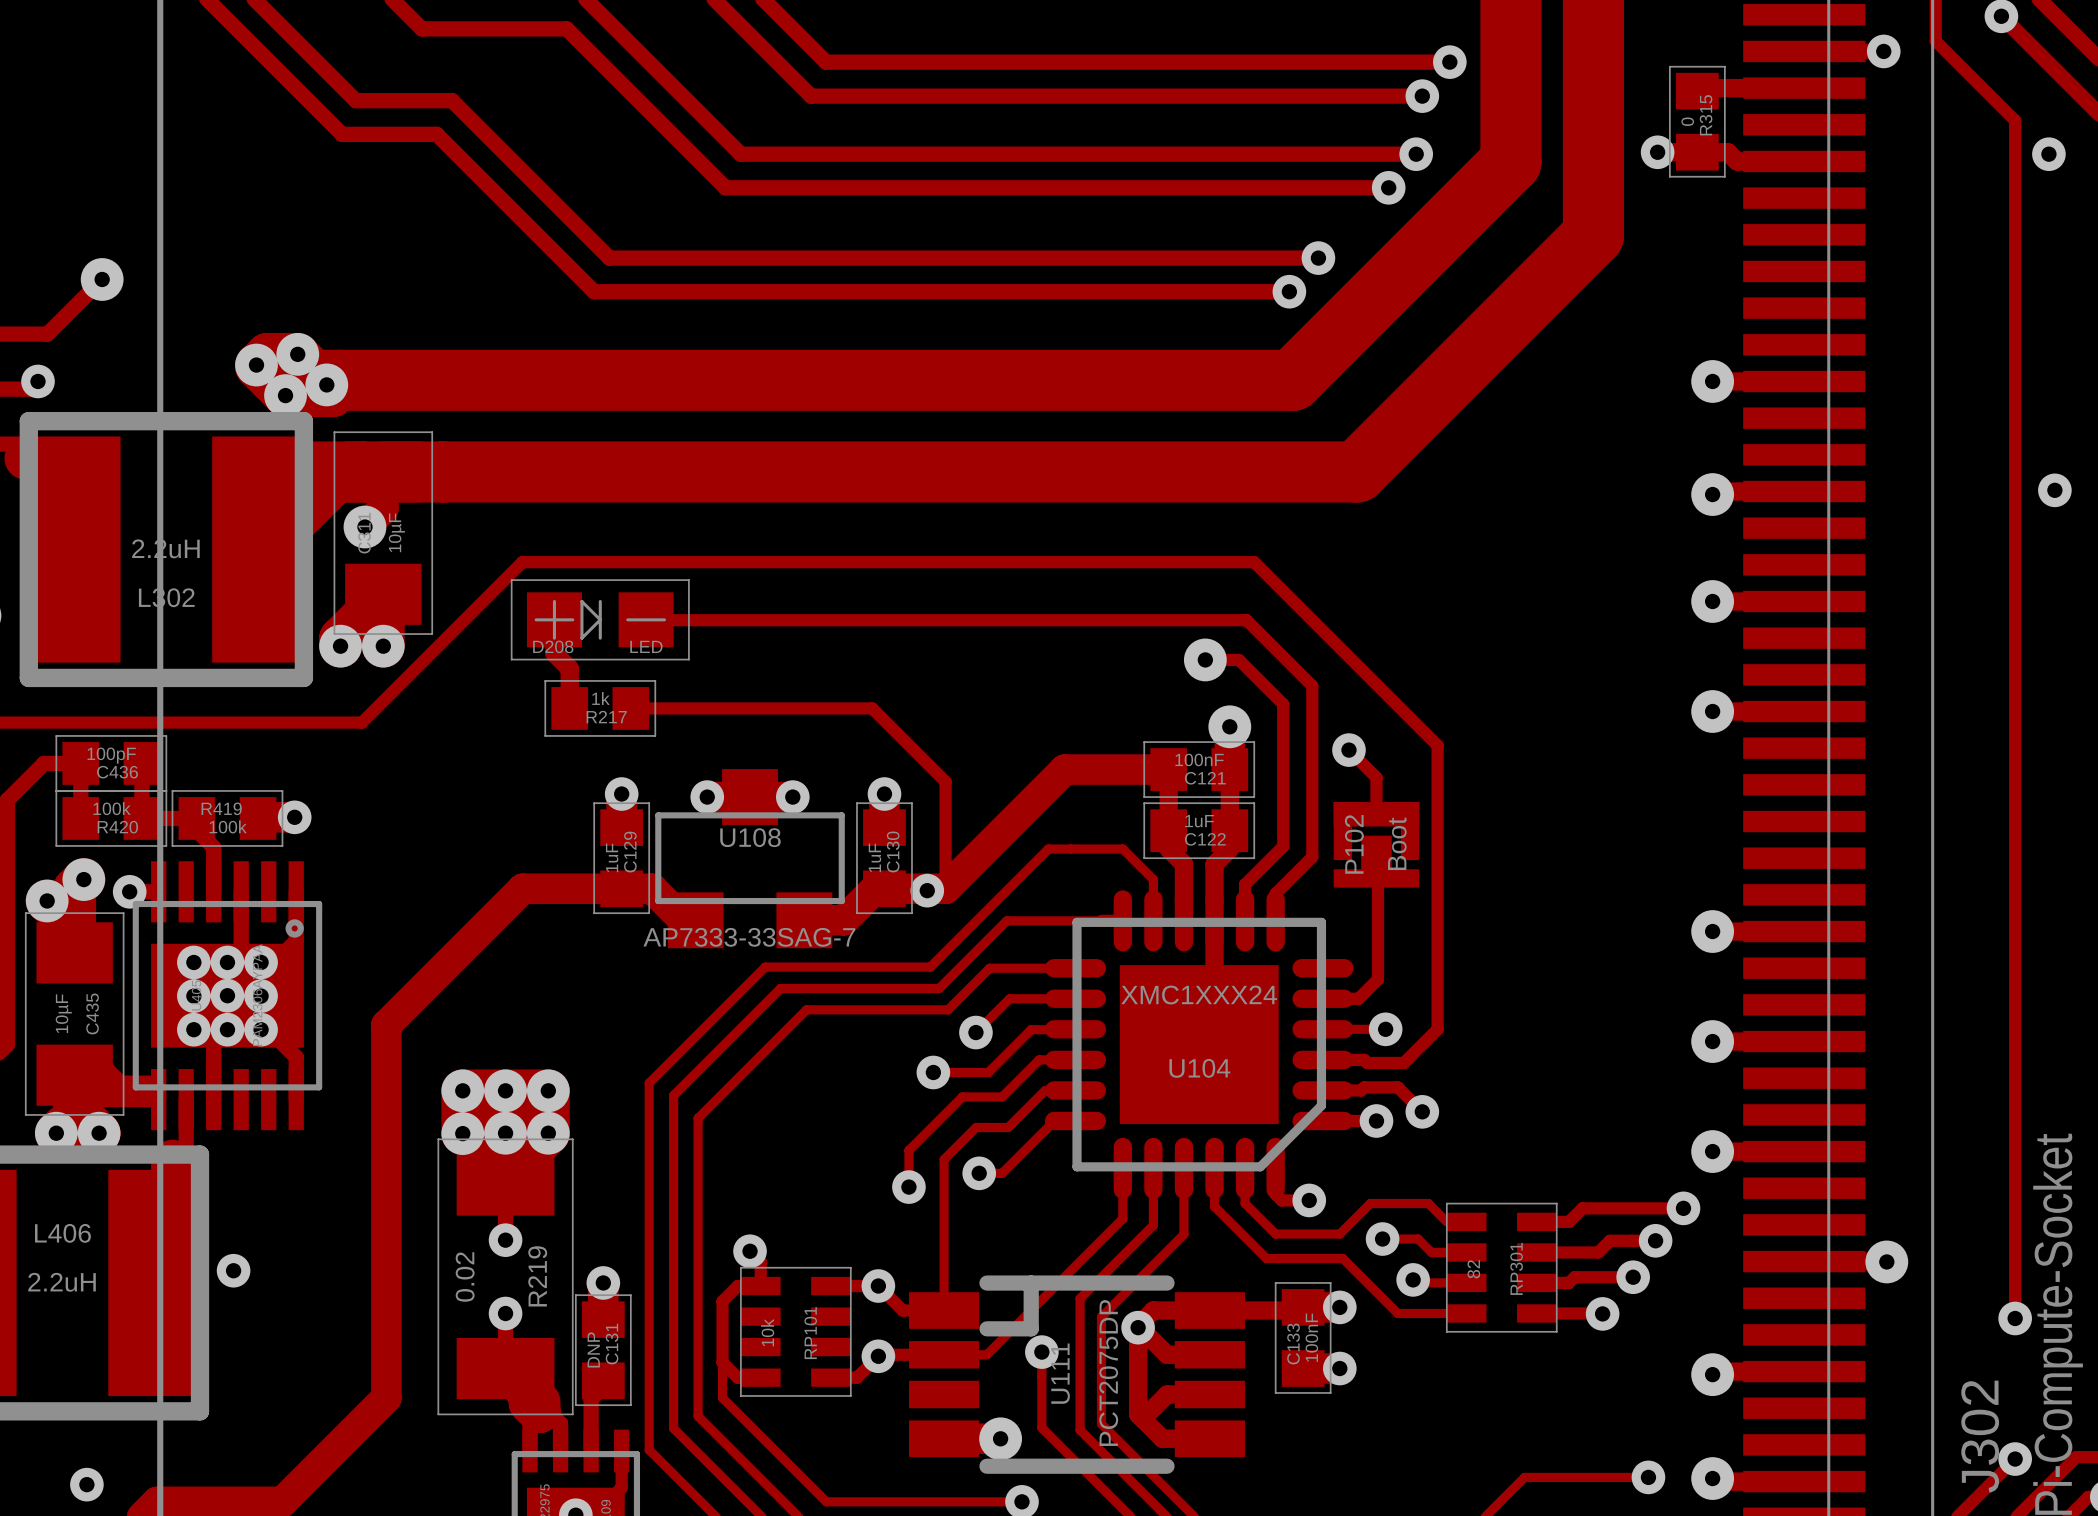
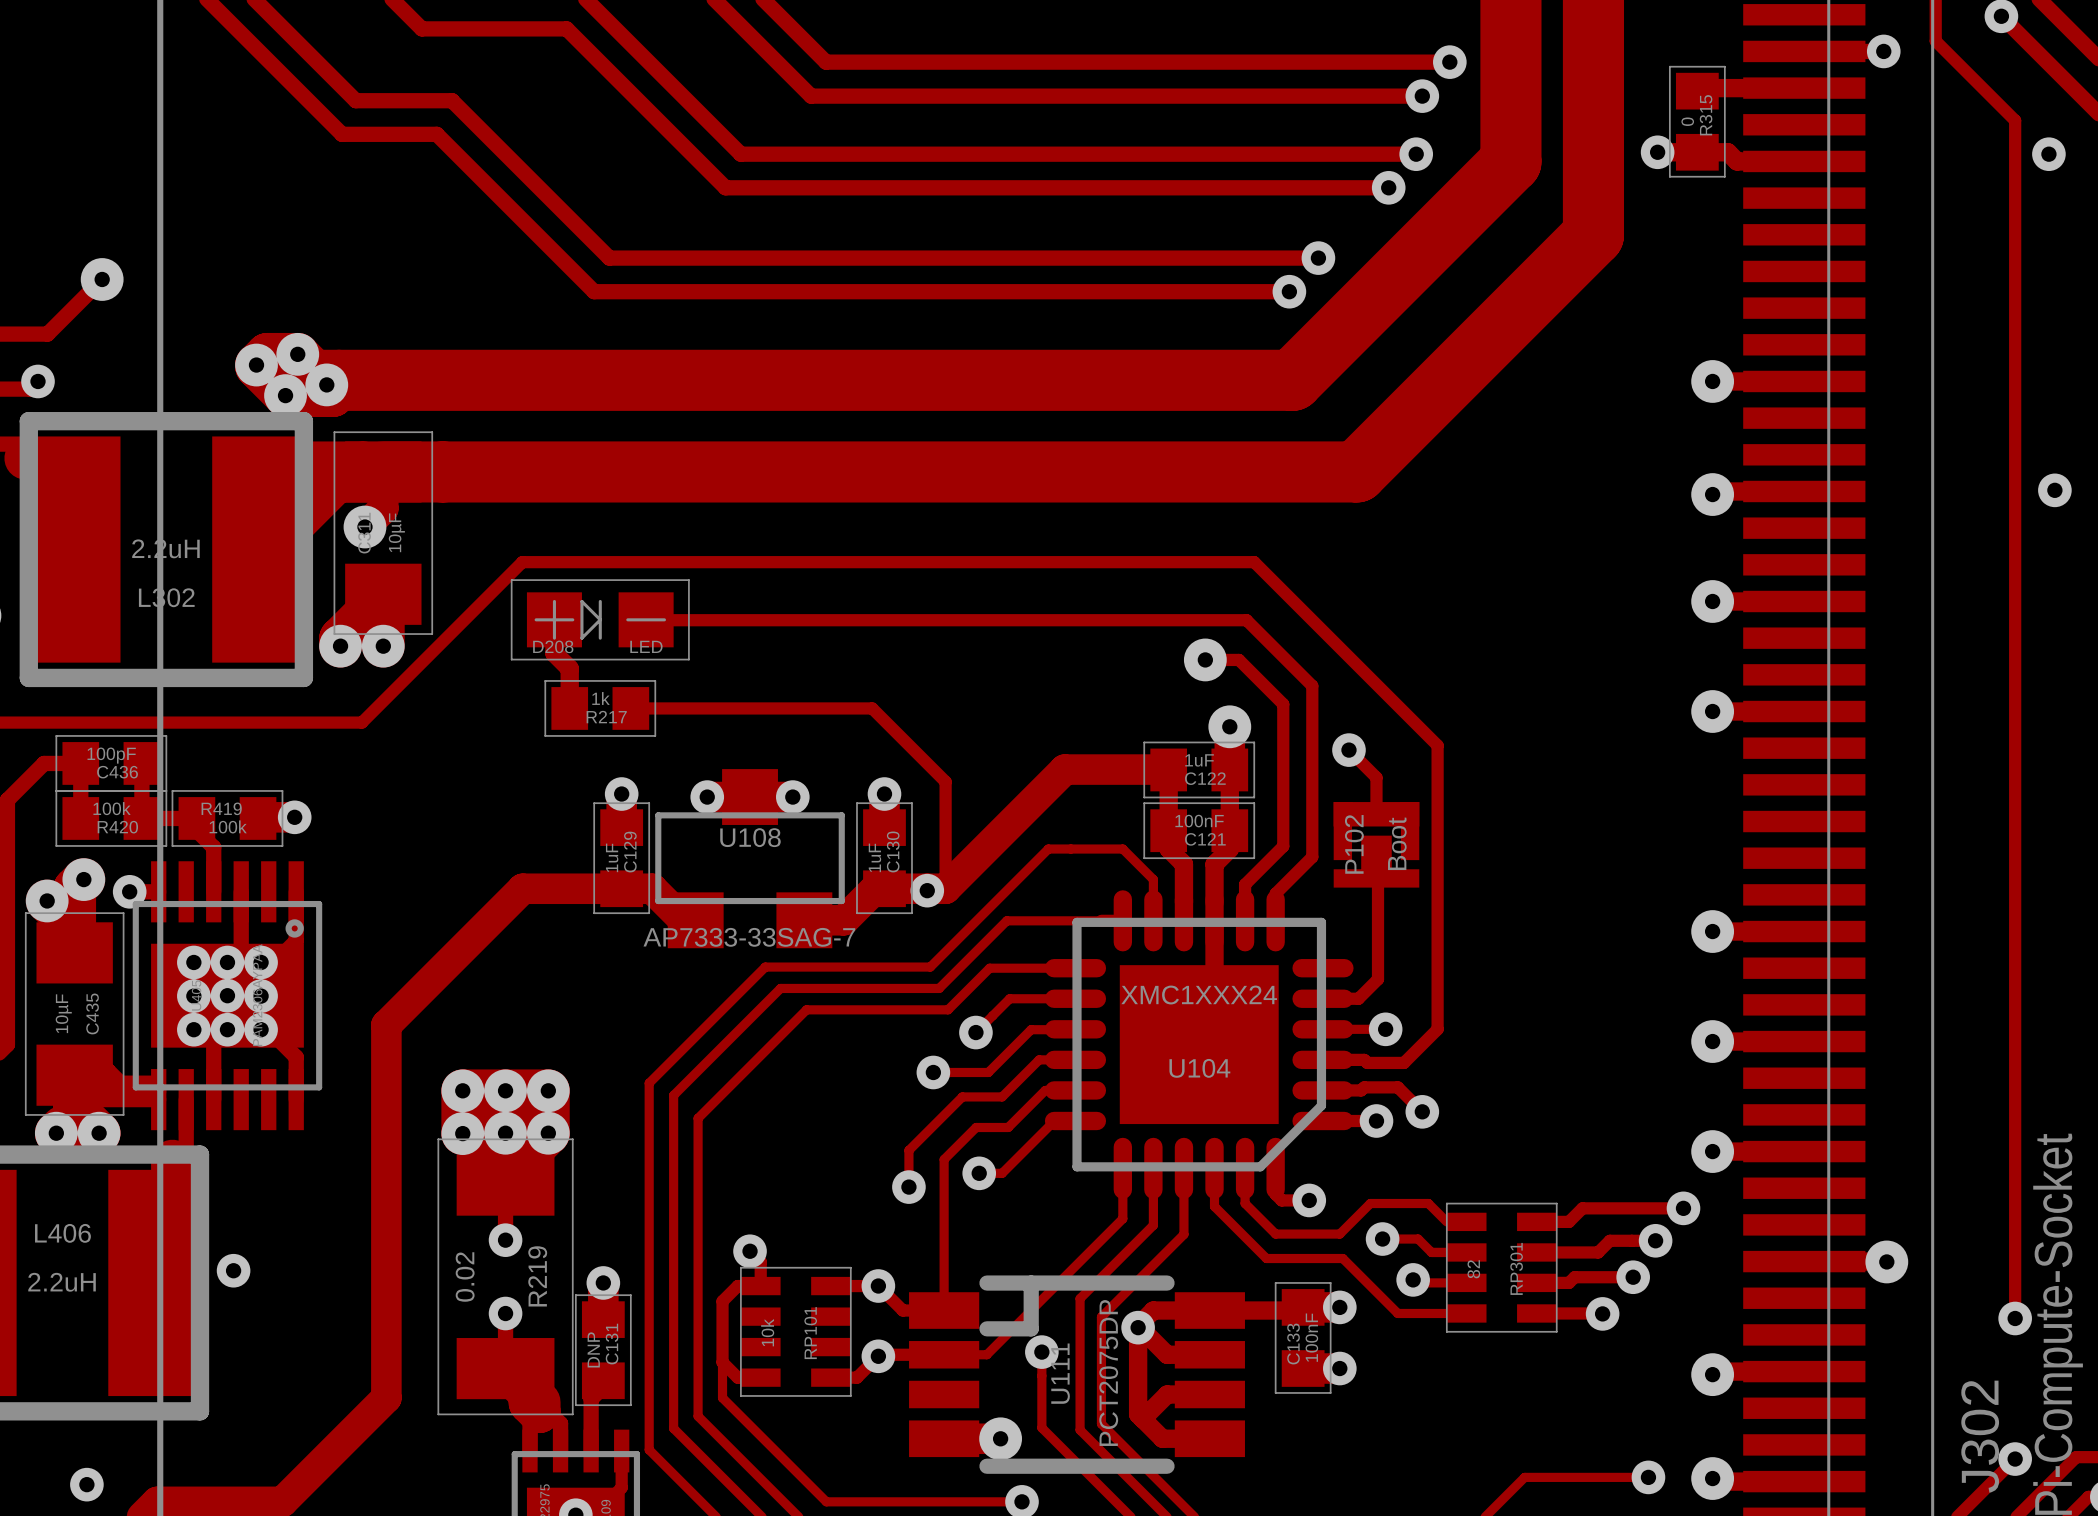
C121 value: 100nF (1199, 759) -> 1uF (1199, 760)
C121 name: C121 (1205, 778) -> C122 (1205, 778)
C122 value: 1uF (1199, 821) -> 100nF (1199, 821)
C122 name: C122 (1205, 839) -> C121 (1205, 839)

